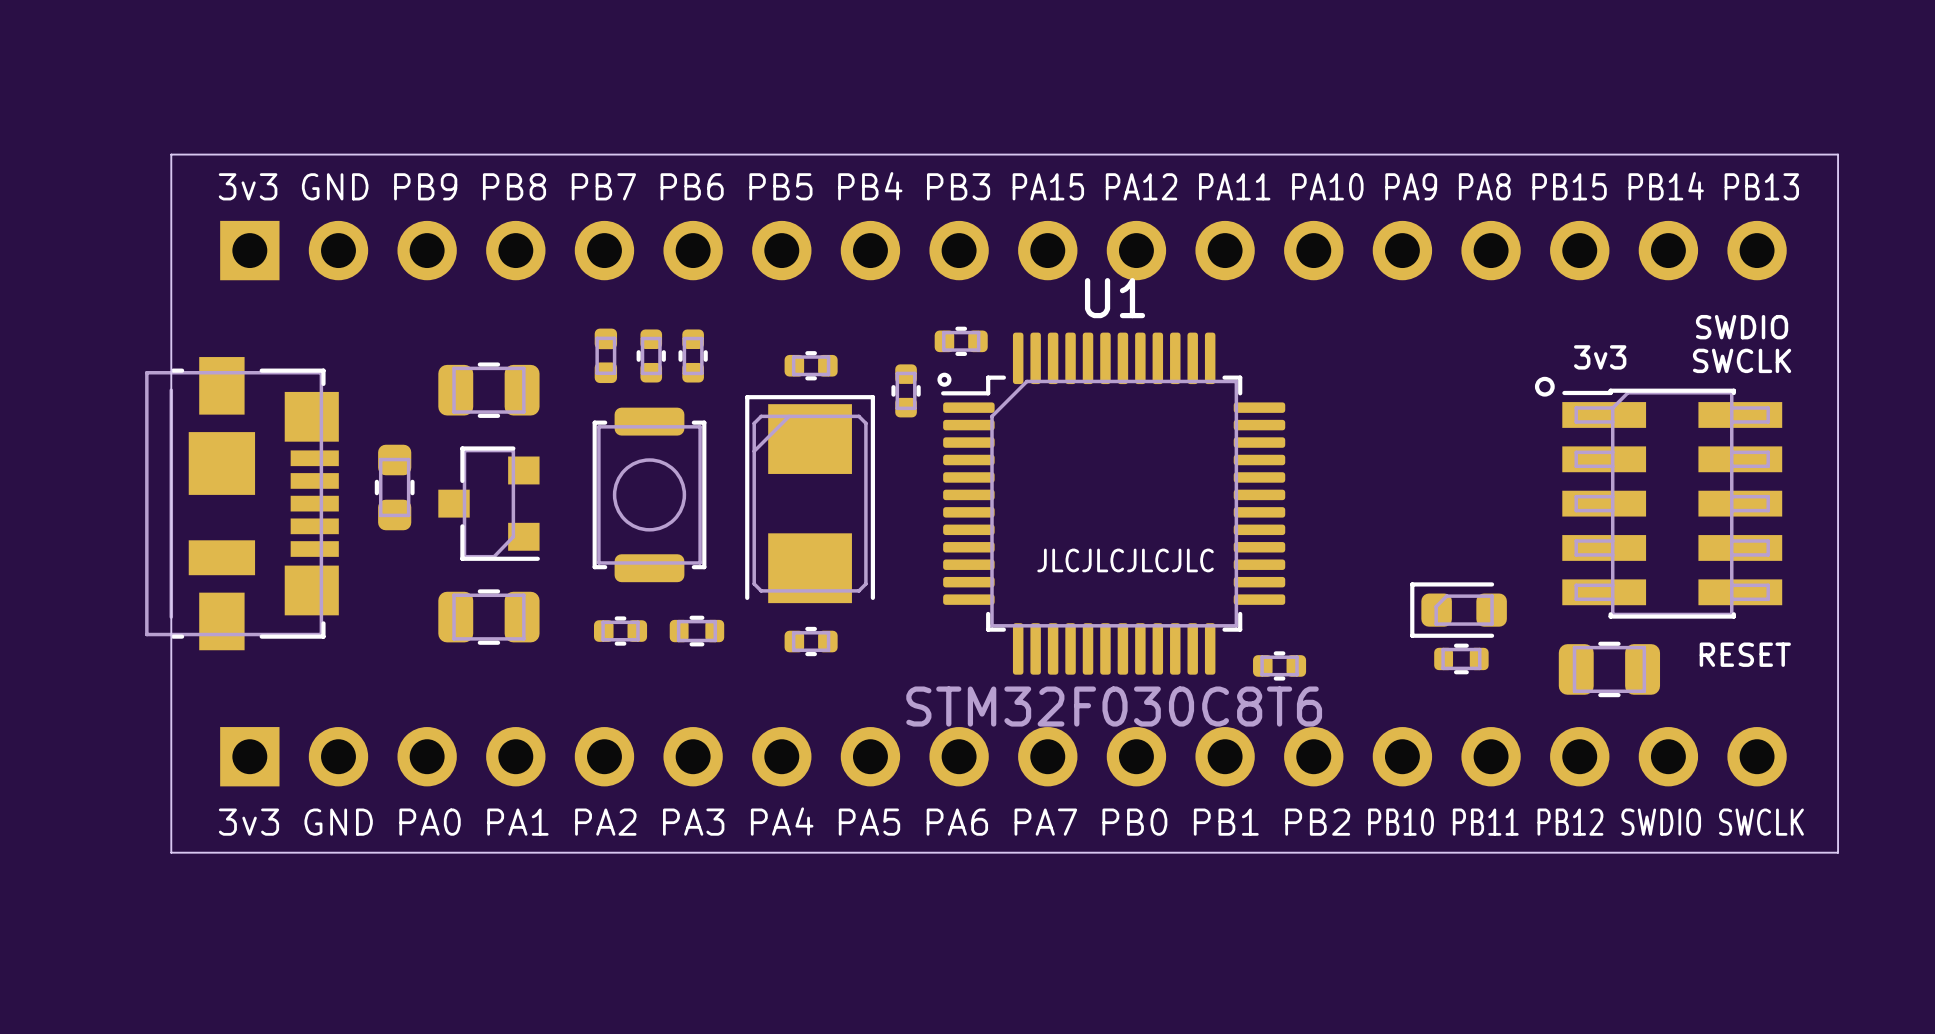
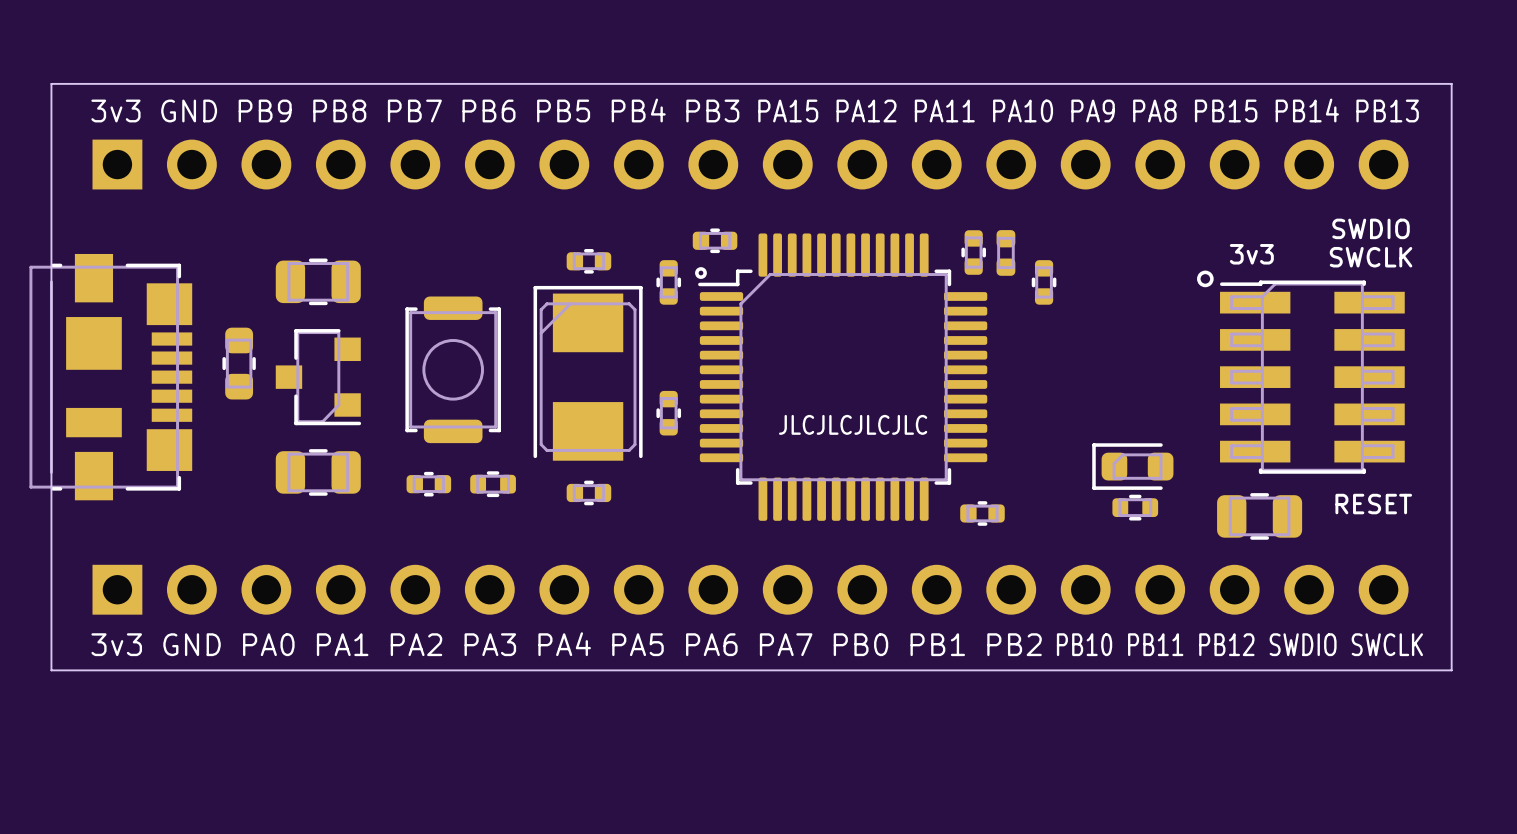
U1 name: U1 (1115, 298) -> none
part position: (605, 355) -> (1005, 252)
part: (651, 355) -> none
part: (693, 355) -> none
part: none -> (973, 252)
part: none -> (1044, 282)
part: none -> (668, 413)
U1 value: STM32F030C8T6 (1114, 706) -> none

